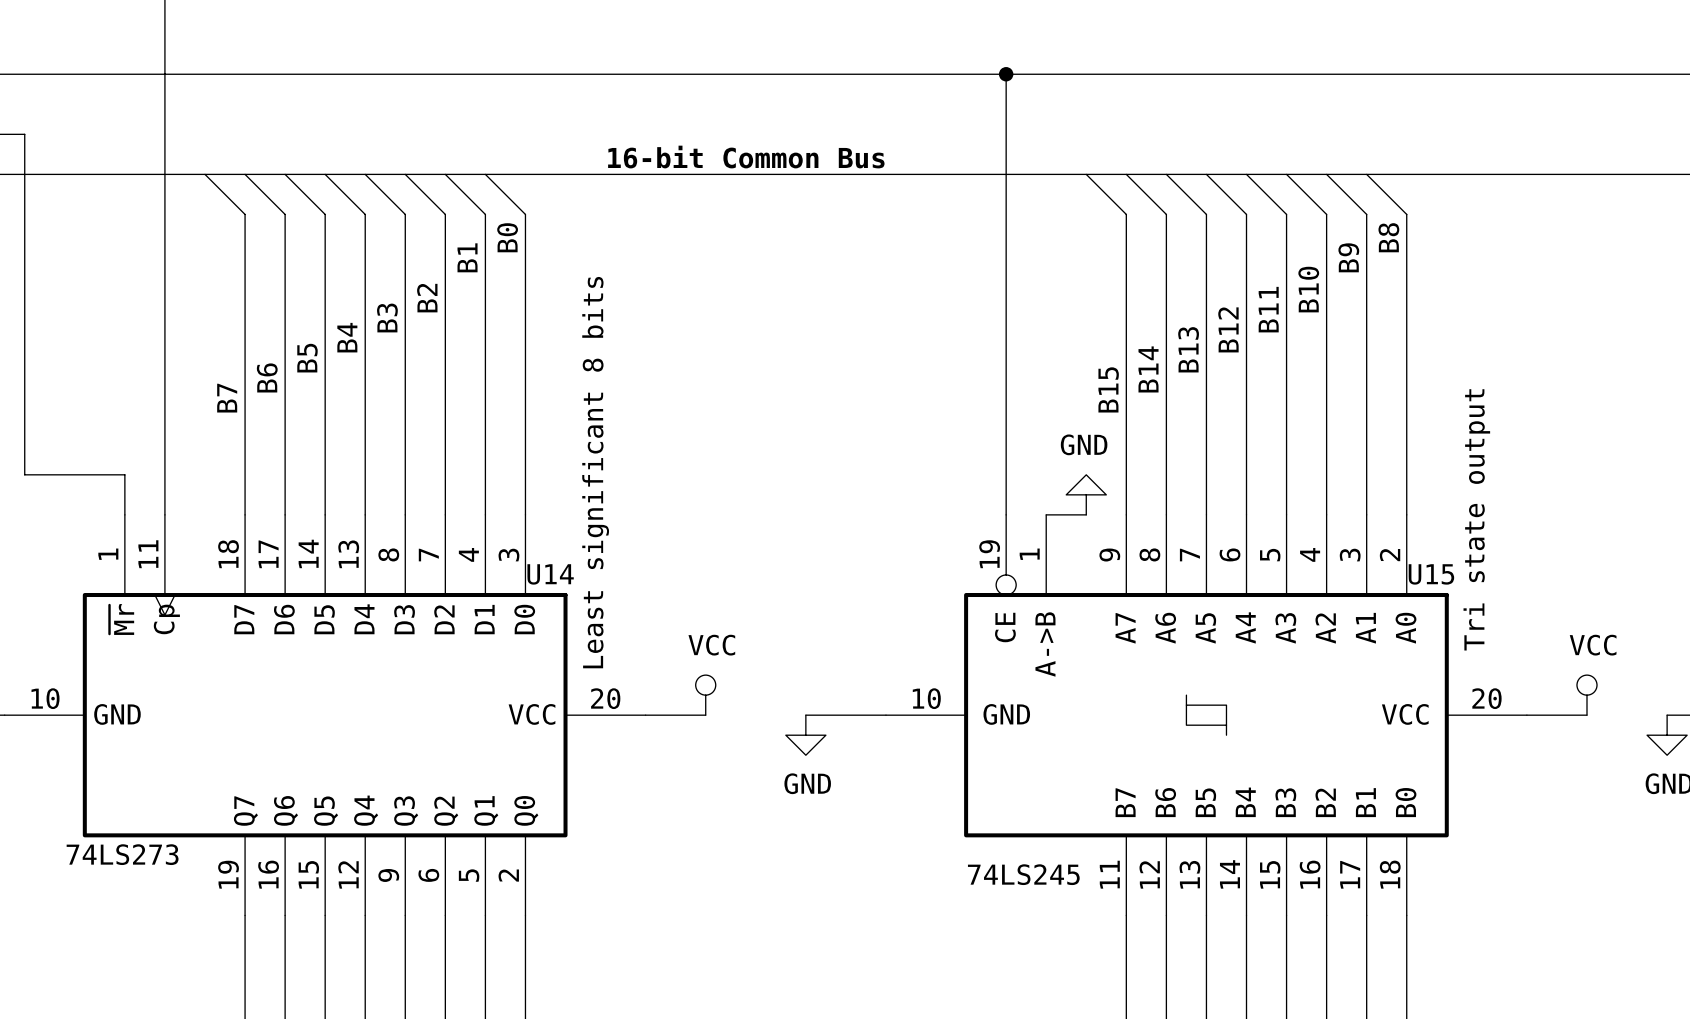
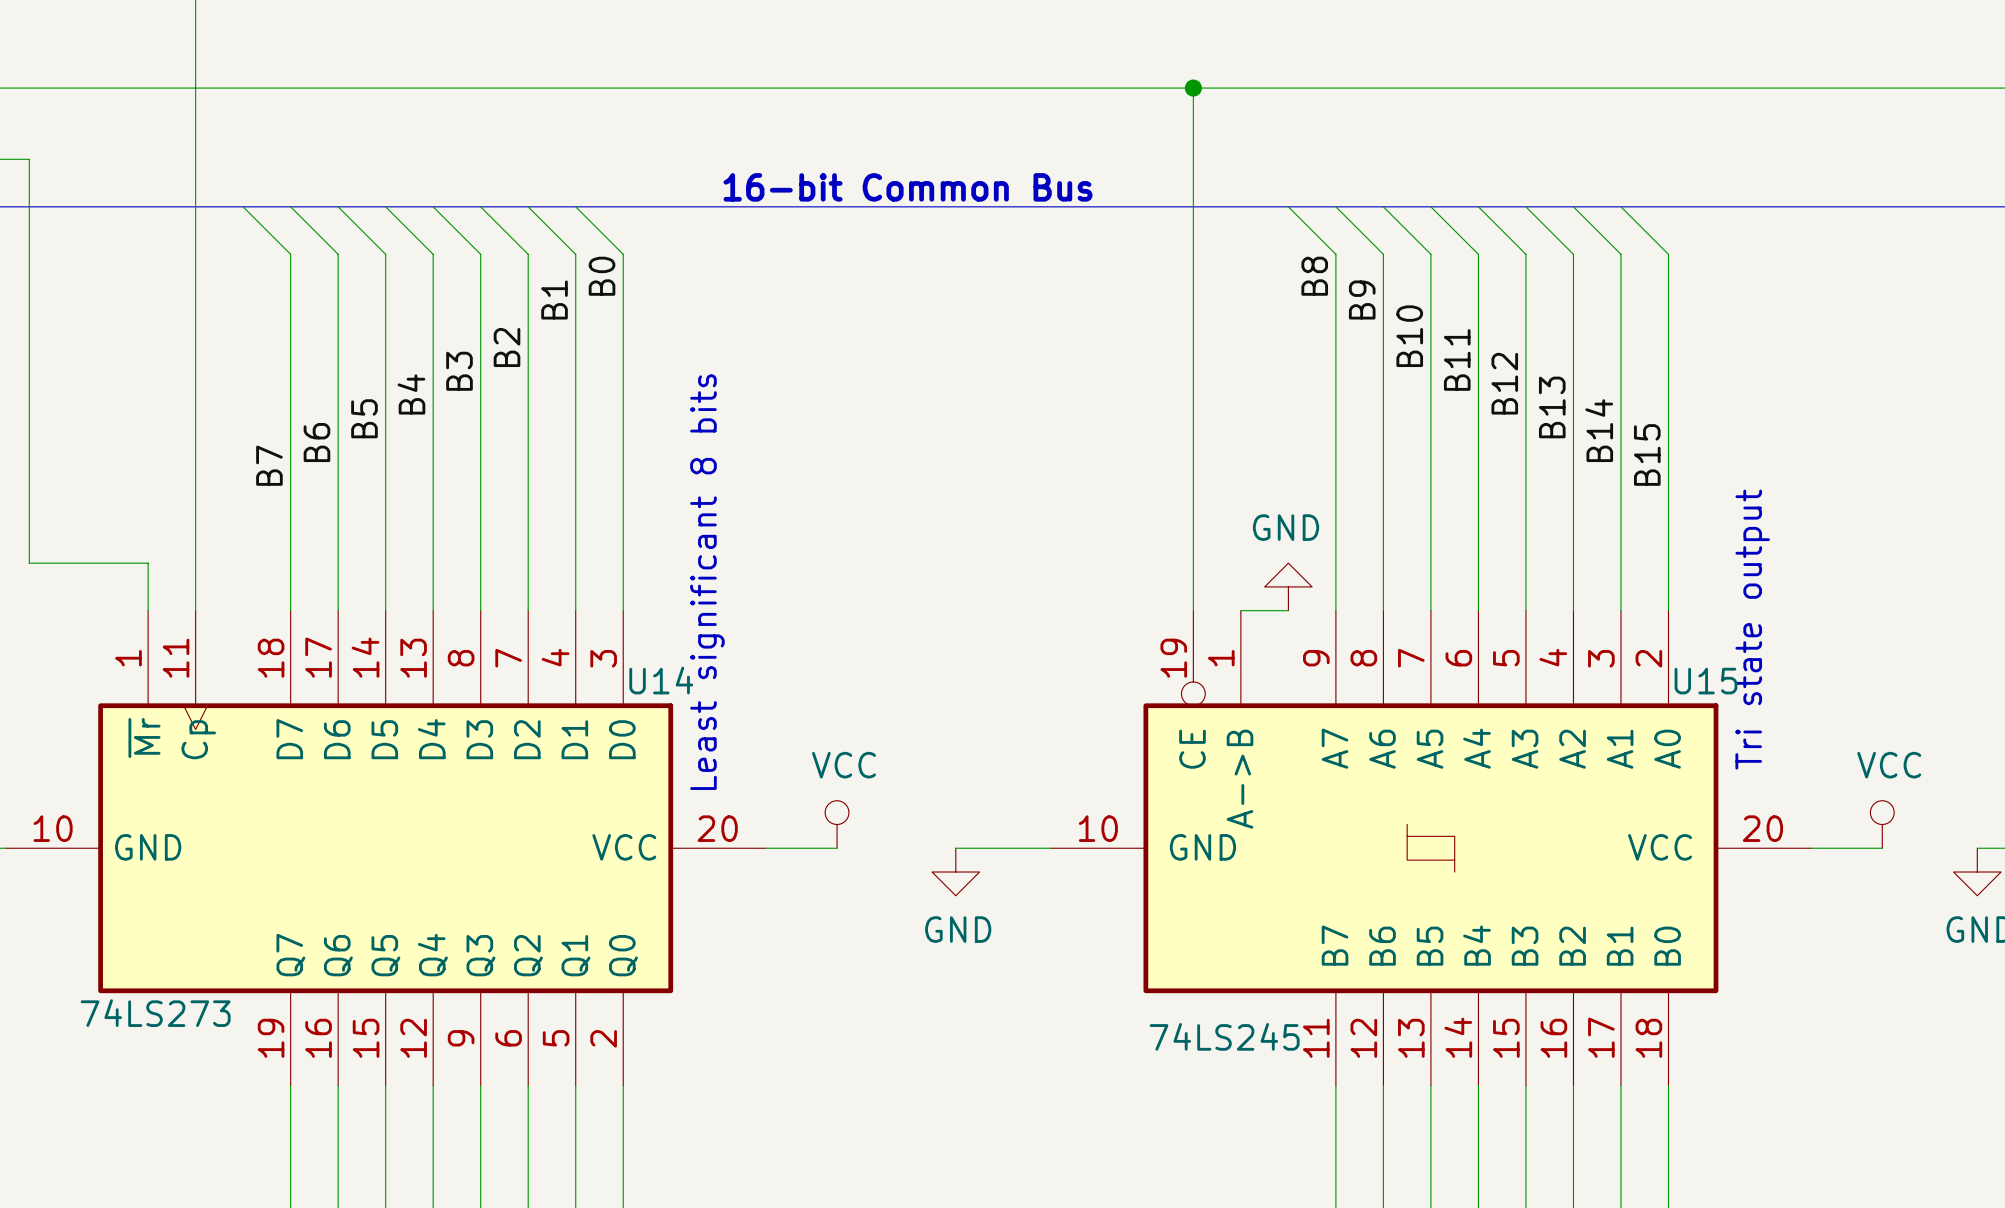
label position: B8 (1388, 237) -> B8 (1314, 276)
label position: B9 (1348, 257) -> B9 (1362, 299)
label position: B10 (1308, 289) -> B10 (1409, 336)
label position: B11 (1268, 309) -> B11 (1457, 359)
label position: B12 (1228, 329) -> B12 (1504, 383)
label position: B13 (1188, 349) -> B13 (1552, 407)
label position: B14 (1148, 369) -> B14 (1599, 430)
label position: B15 (1108, 389) -> B15 (1647, 454)

